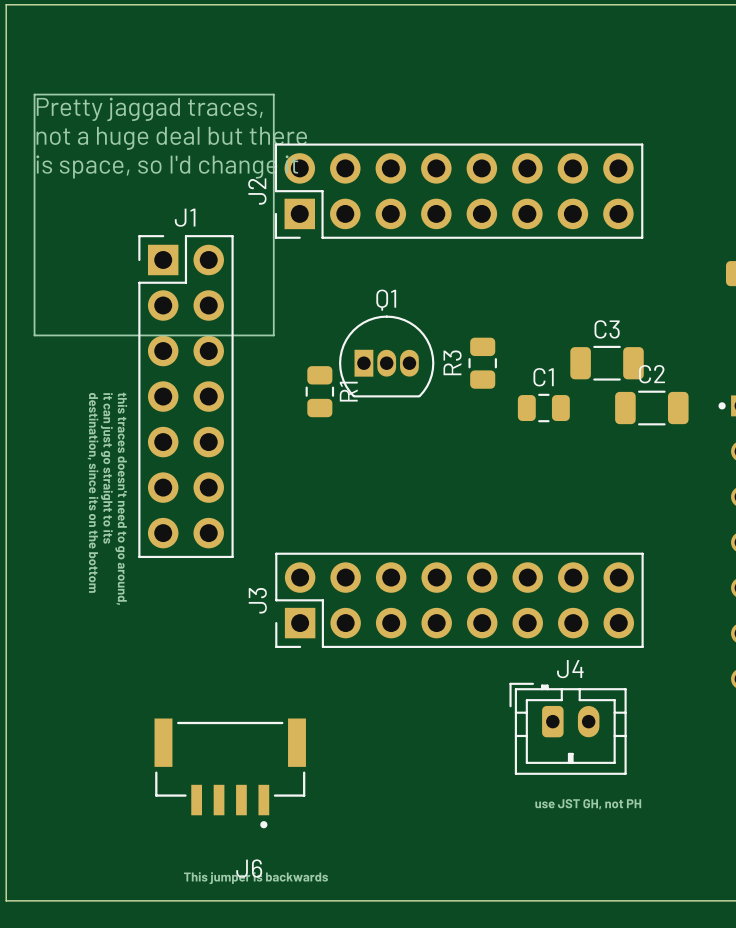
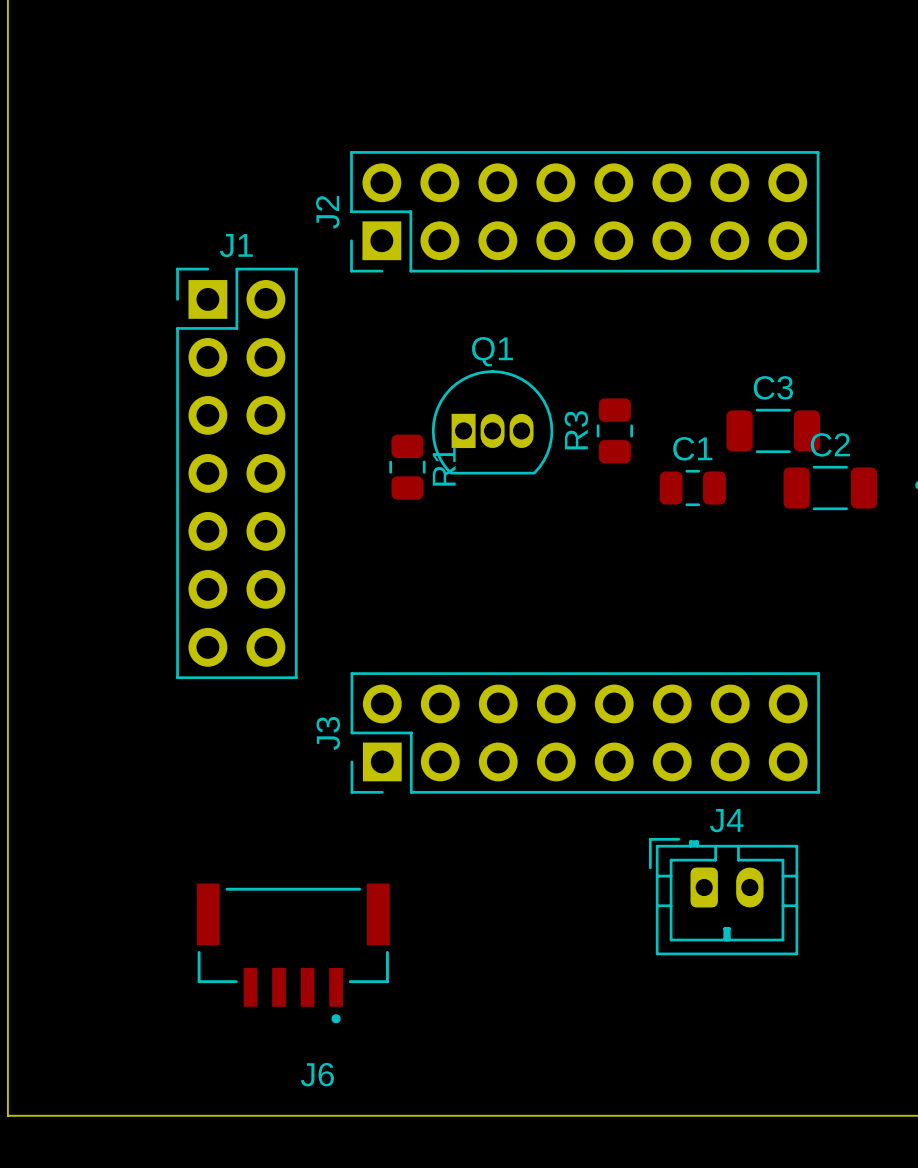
line: (34, 94) (273, 94) (273, 335) (34, 335) (34, 94) -> none
text: Pretty jaggad traces, (149, 109) -> none
text: not a huge deal but there (171, 138) -> none
text: is space, so I'd change it (167, 167) -> none
text: it can just go straight to its (106, 468) -> none
text: destination, since its on the bottom (93, 492) -> none
text: this traces doesn't need to go around, (121, 498) -> none
text: use JST GH, not PH (588, 804) -> none
text: This jumper is backwards (255, 878) -> none

